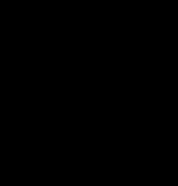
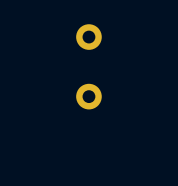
part: none -> (88, 37)
part: none -> (88, 96)

